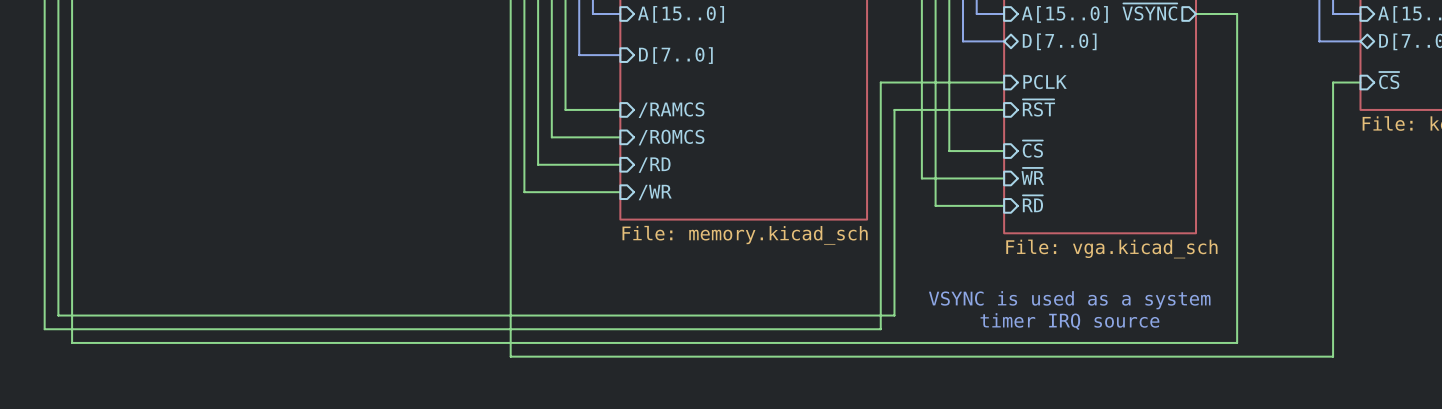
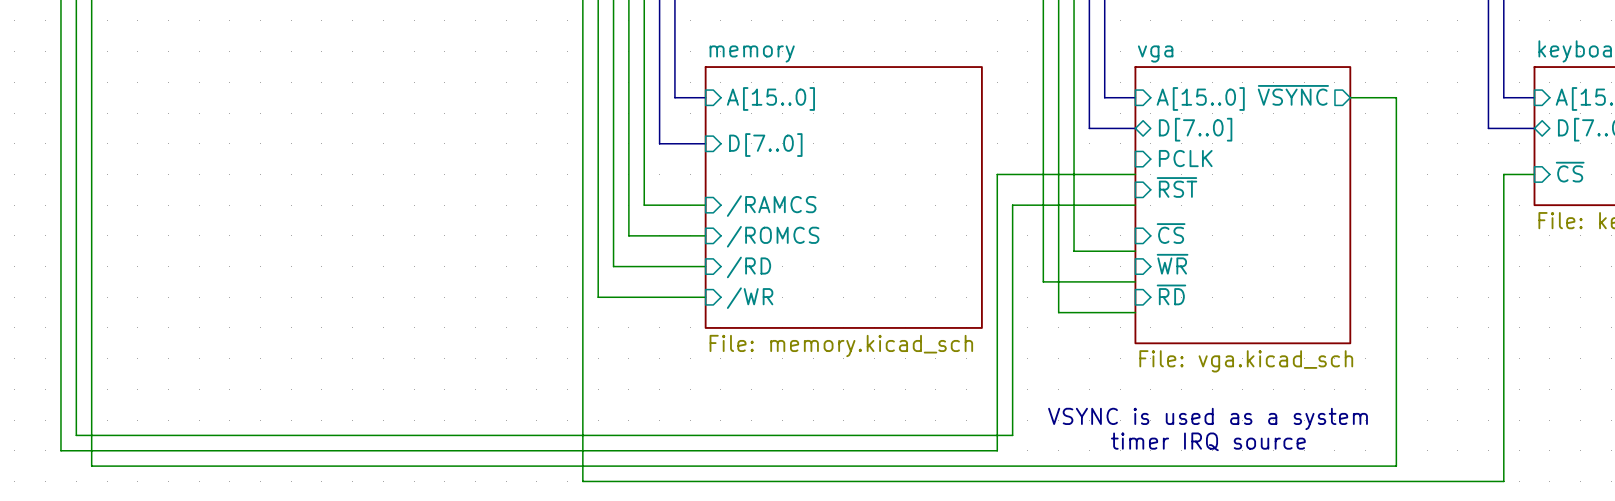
sheet pin position: PCLK (1045, 82) -> PCLK (1185, 158)
sheet pin position: ~{RST} (1038, 107) -> ~{RST} (1176, 187)
sheet pin position: ~{CS} (1032, 149) -> ~{CS} (1171, 233)
sheet pin position: ~{WR} (1032, 176) -> ~{WR} (1172, 264)
sheet pin position: ~{RD} (1032, 203) -> ~{RD} (1171, 294)

